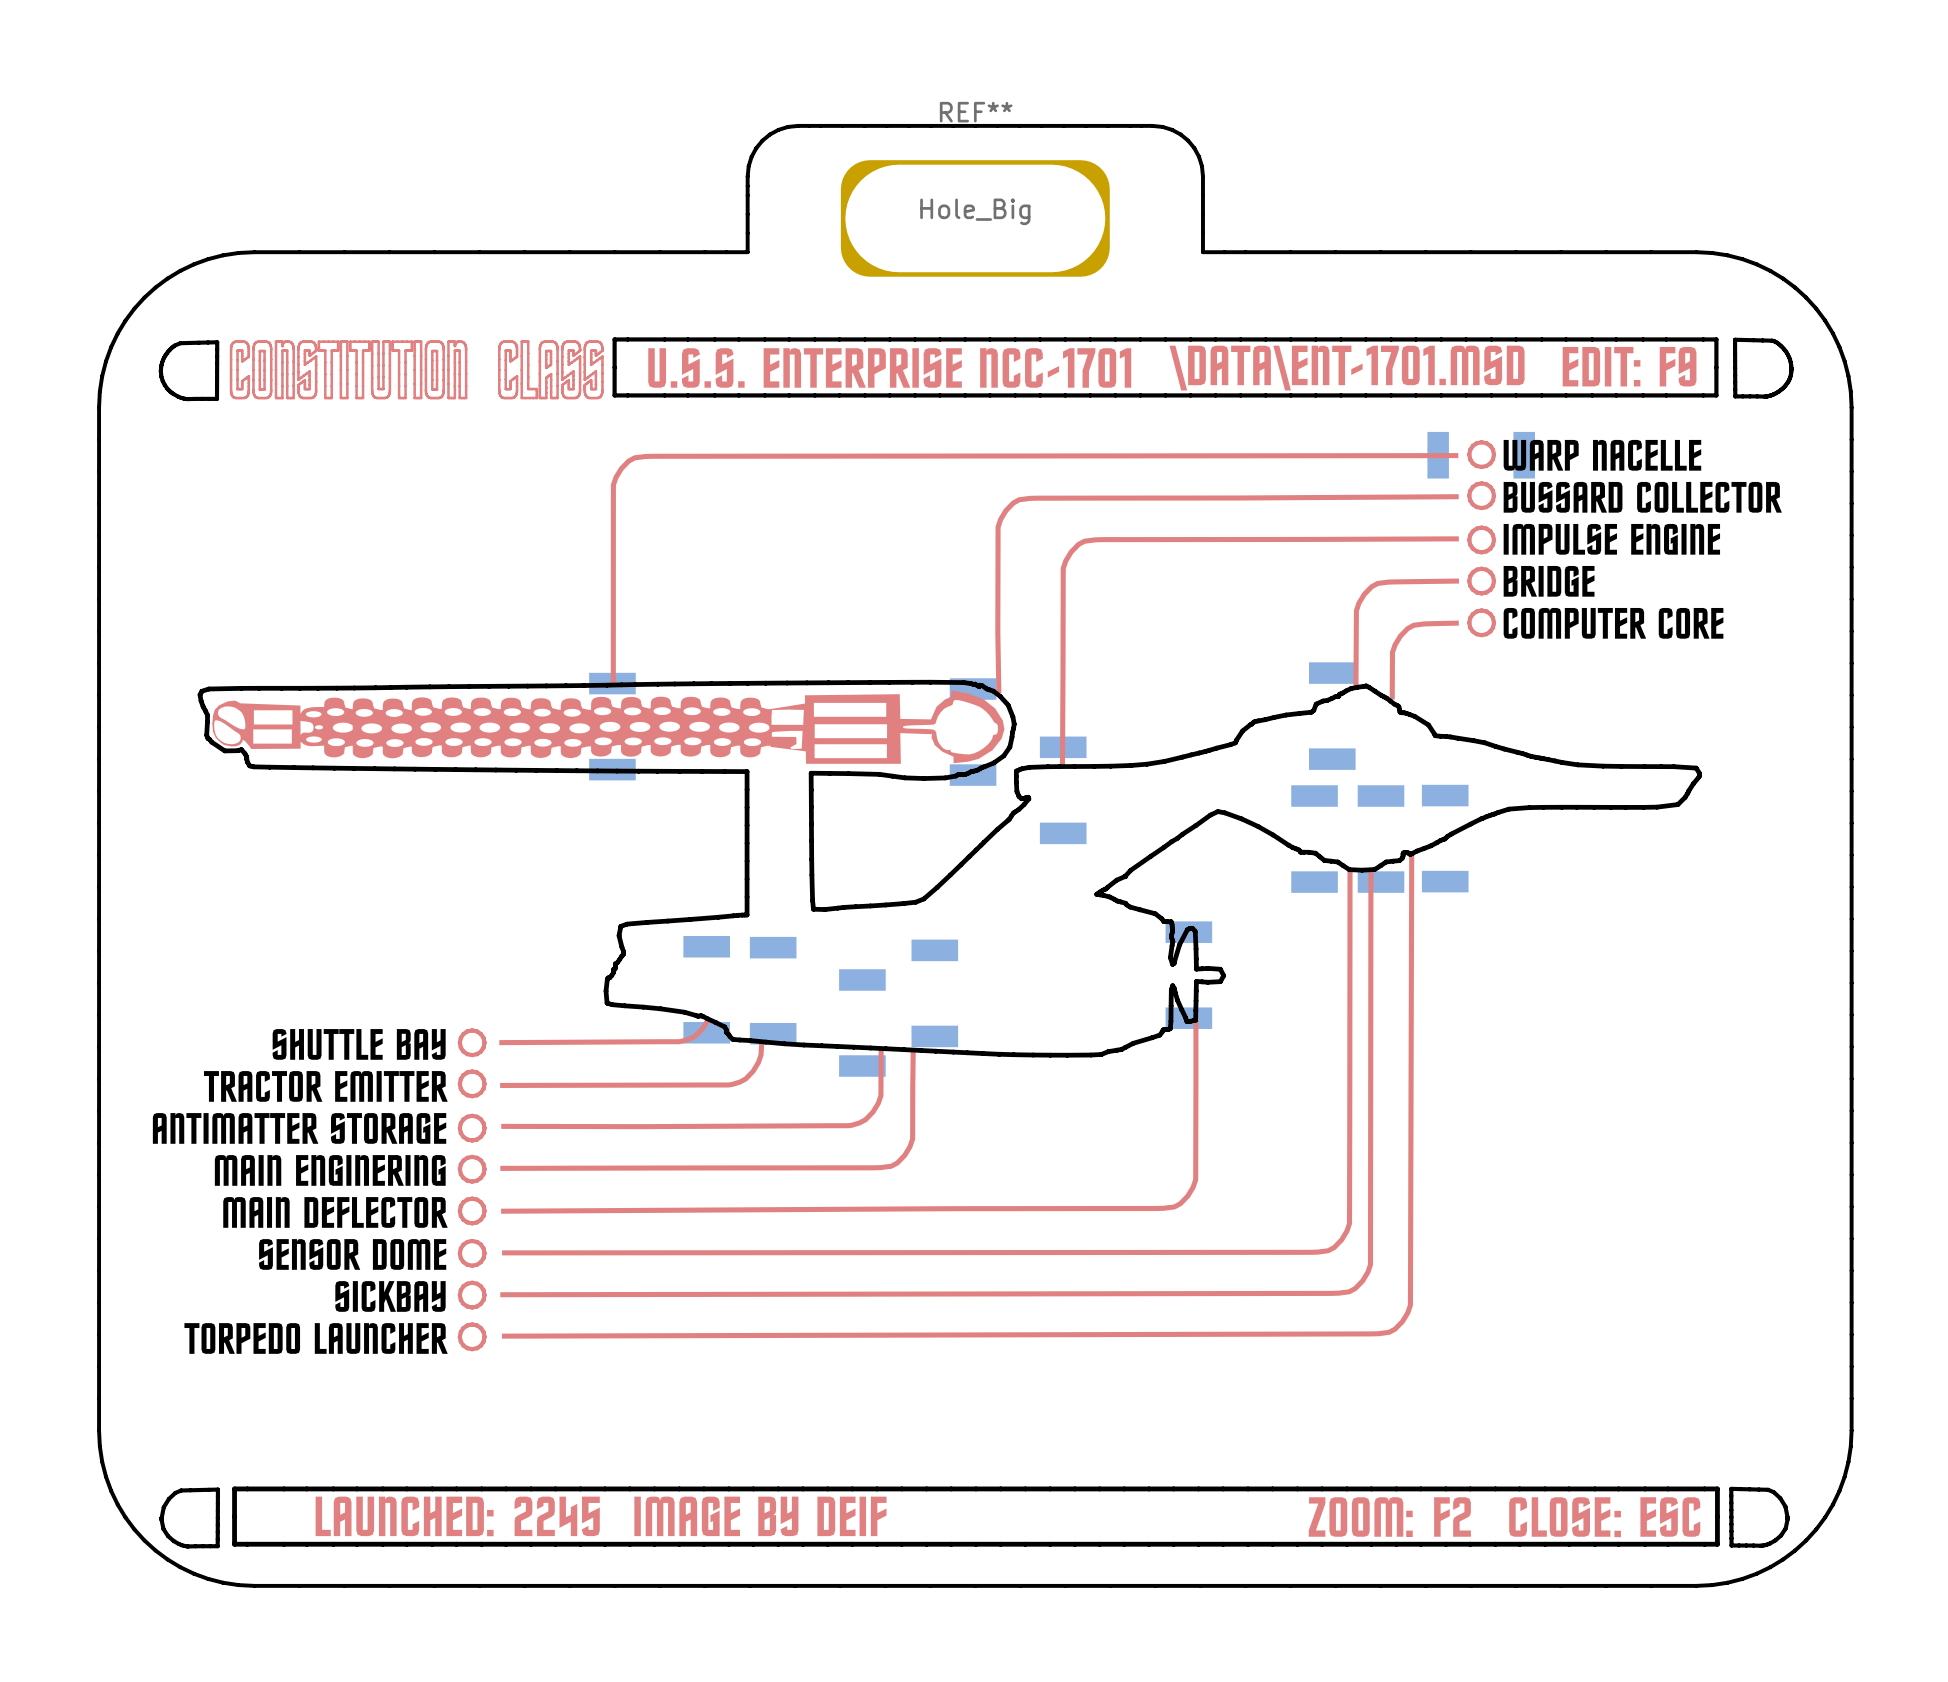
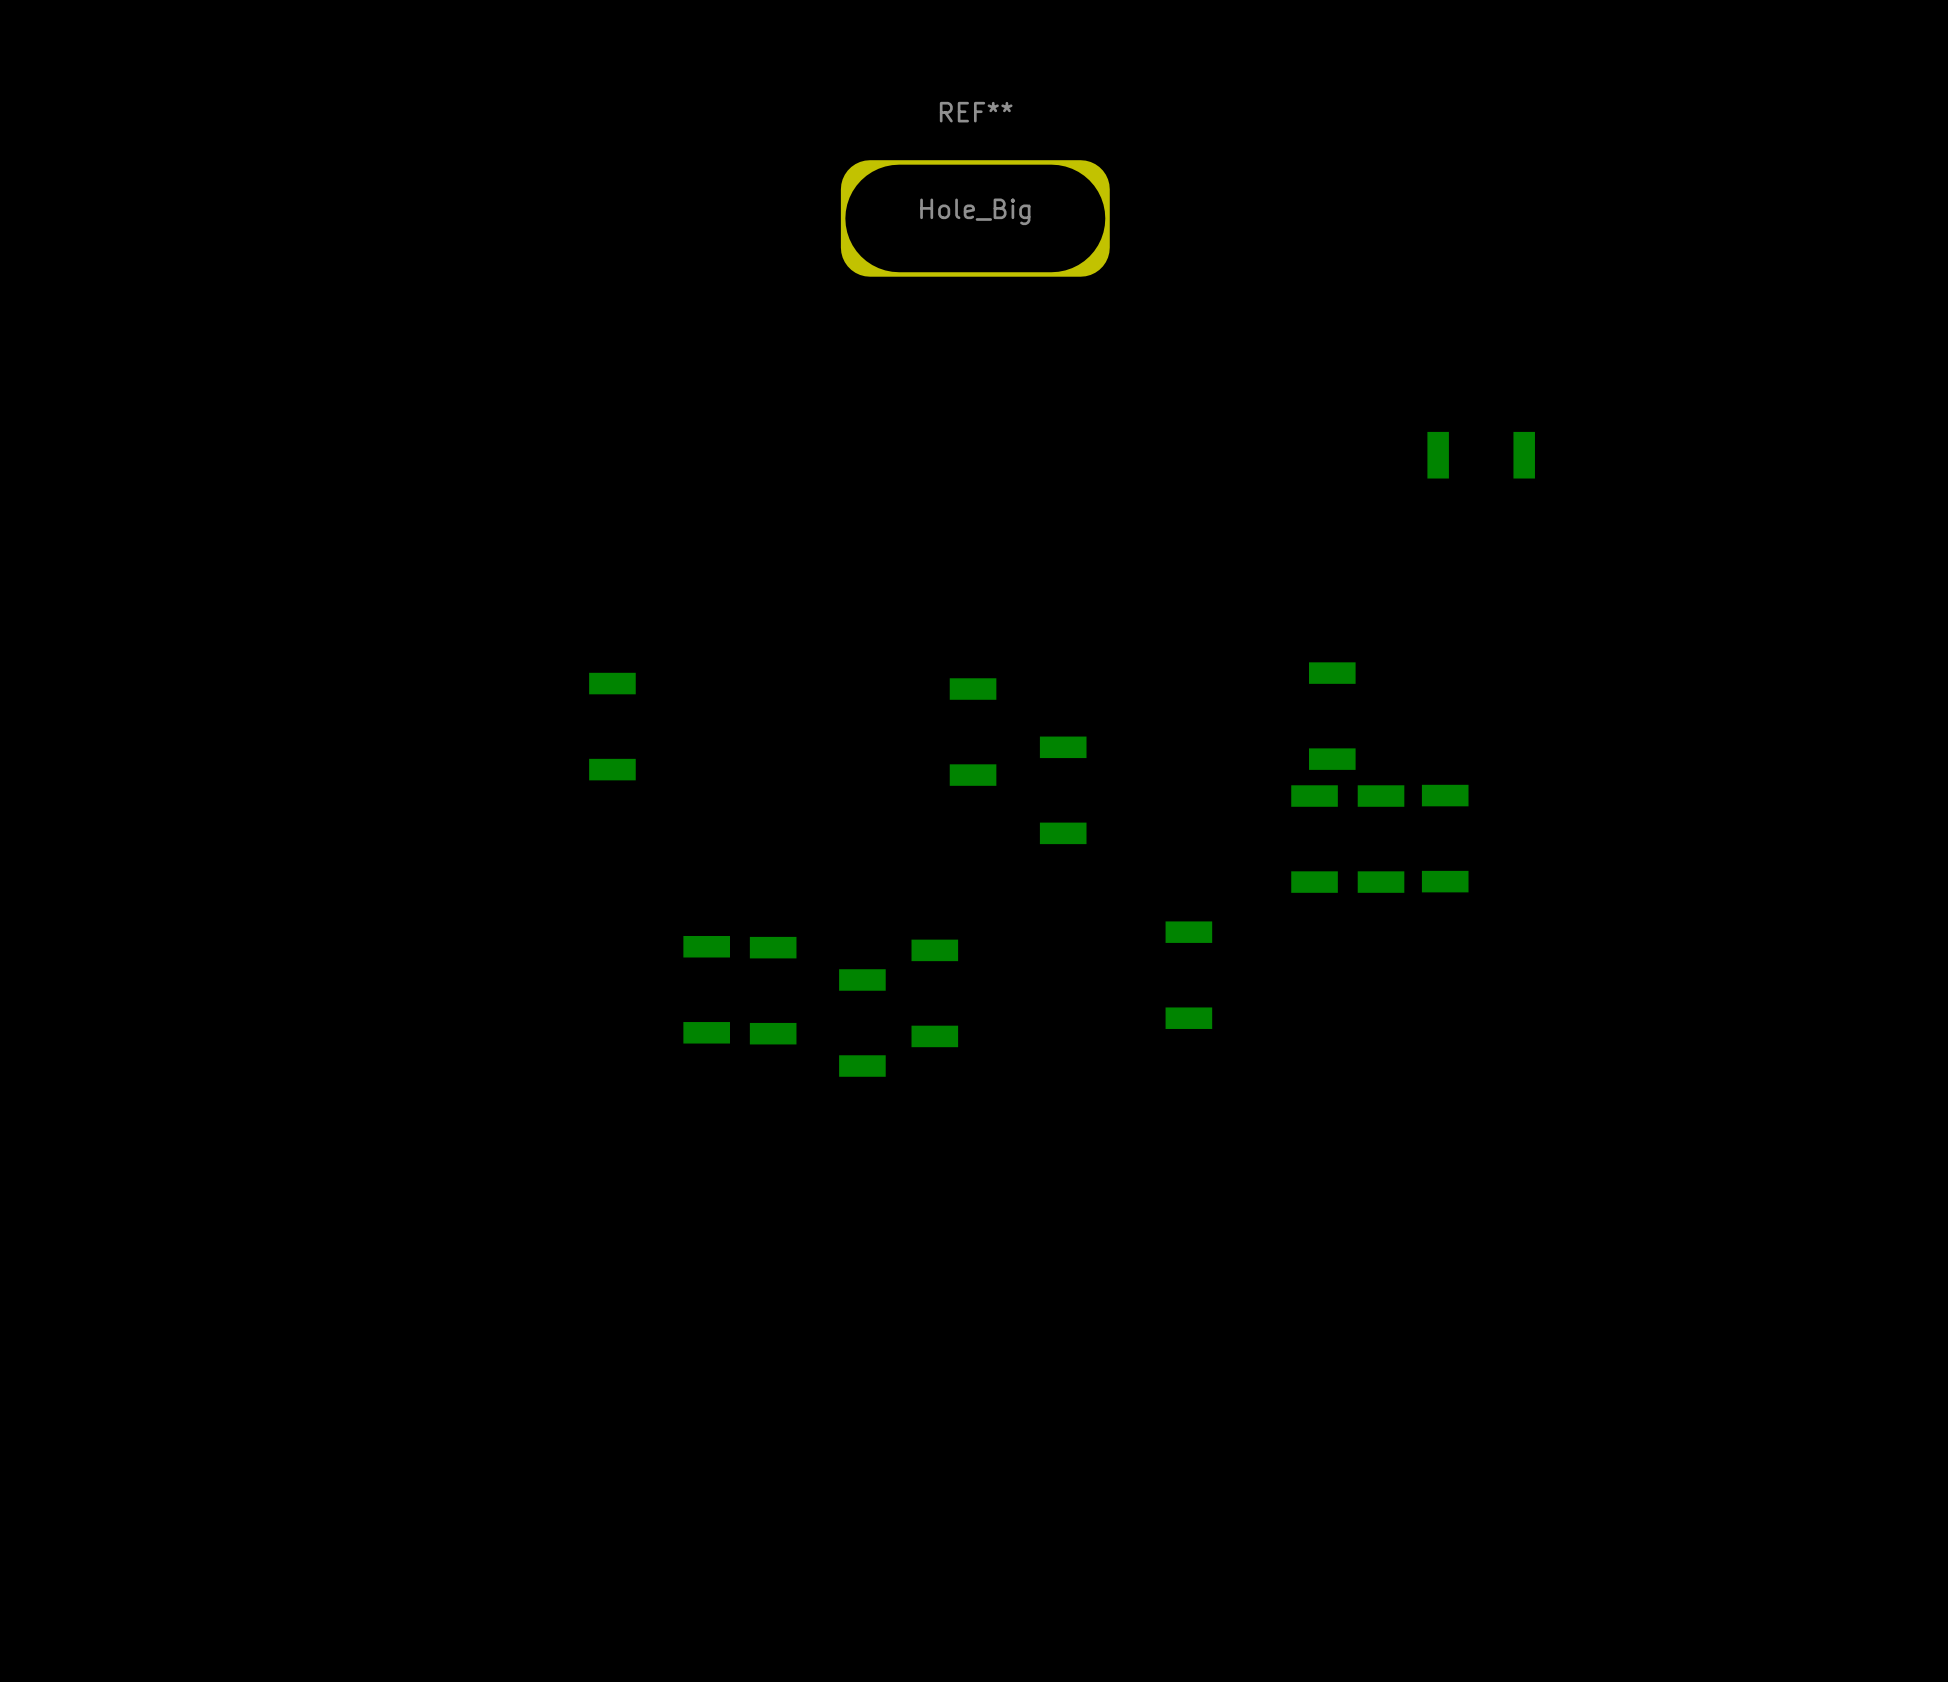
drawing: [97, 123, 1854, 1588] -> none

